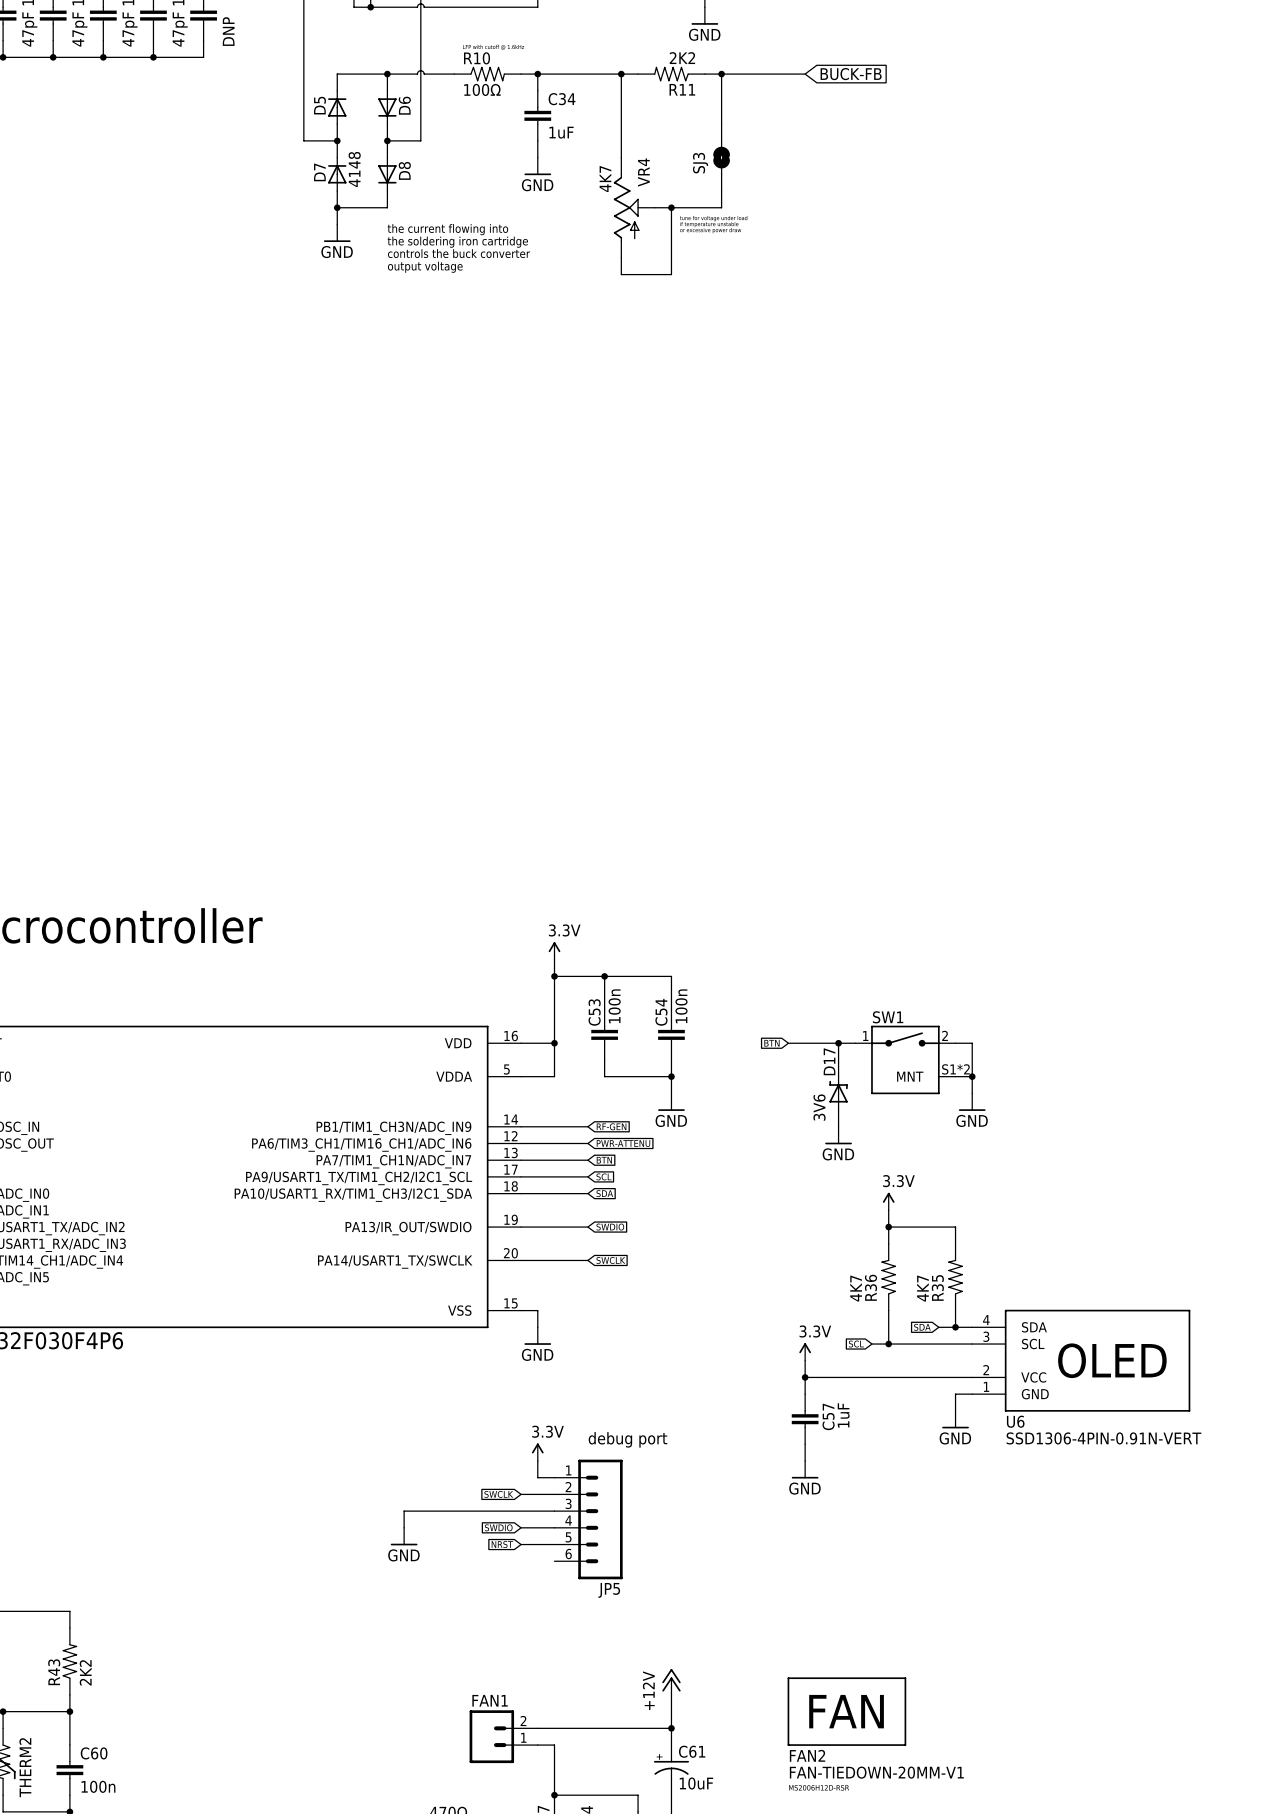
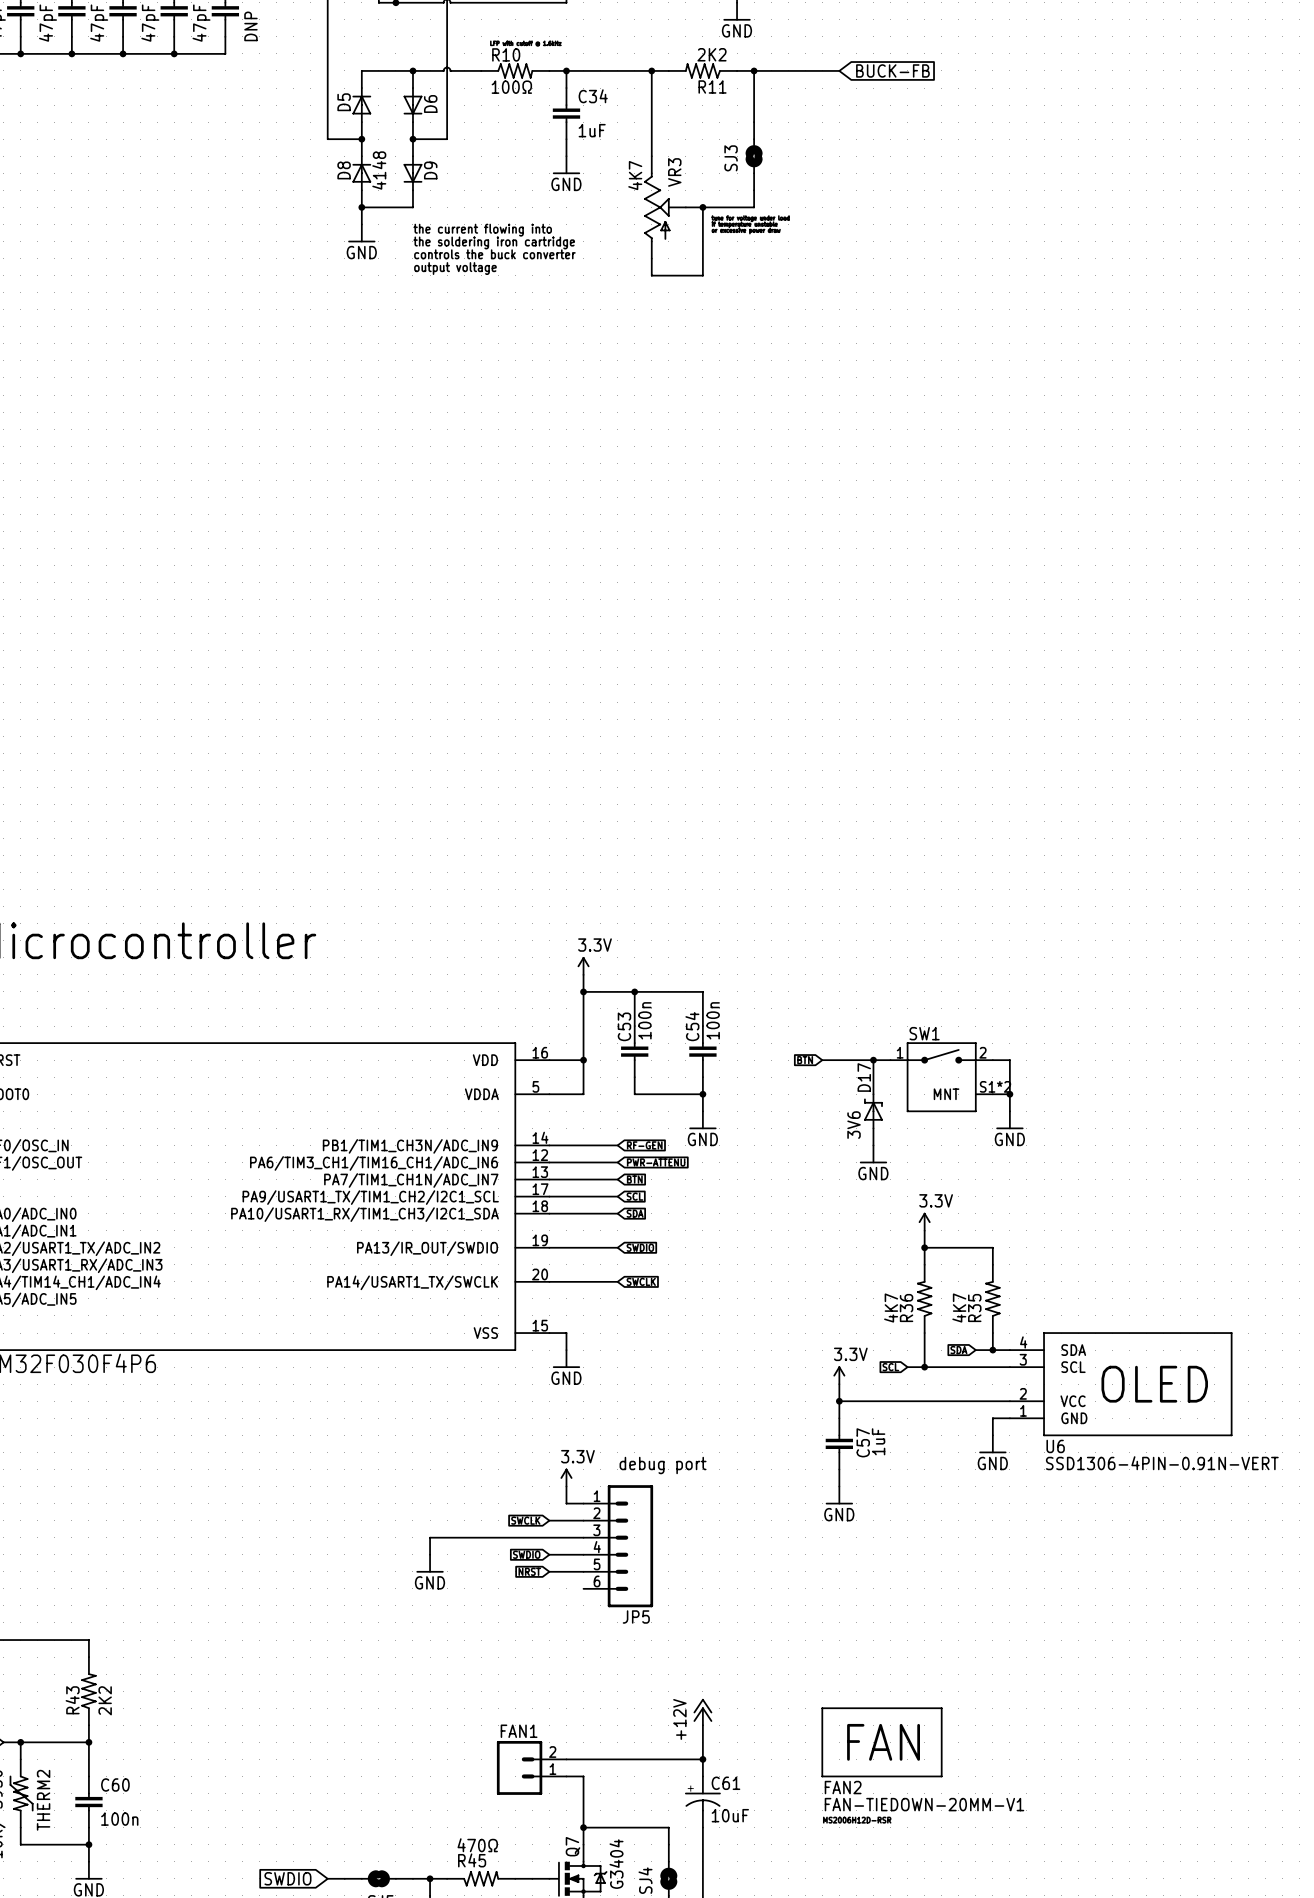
D8 name: D8 (404, 170) -> D9 (430, 170)
D7 name: D7 (319, 172) -> D8 (344, 170)
VR4 name: VR4 (643, 172) -> VR3 (674, 172)

